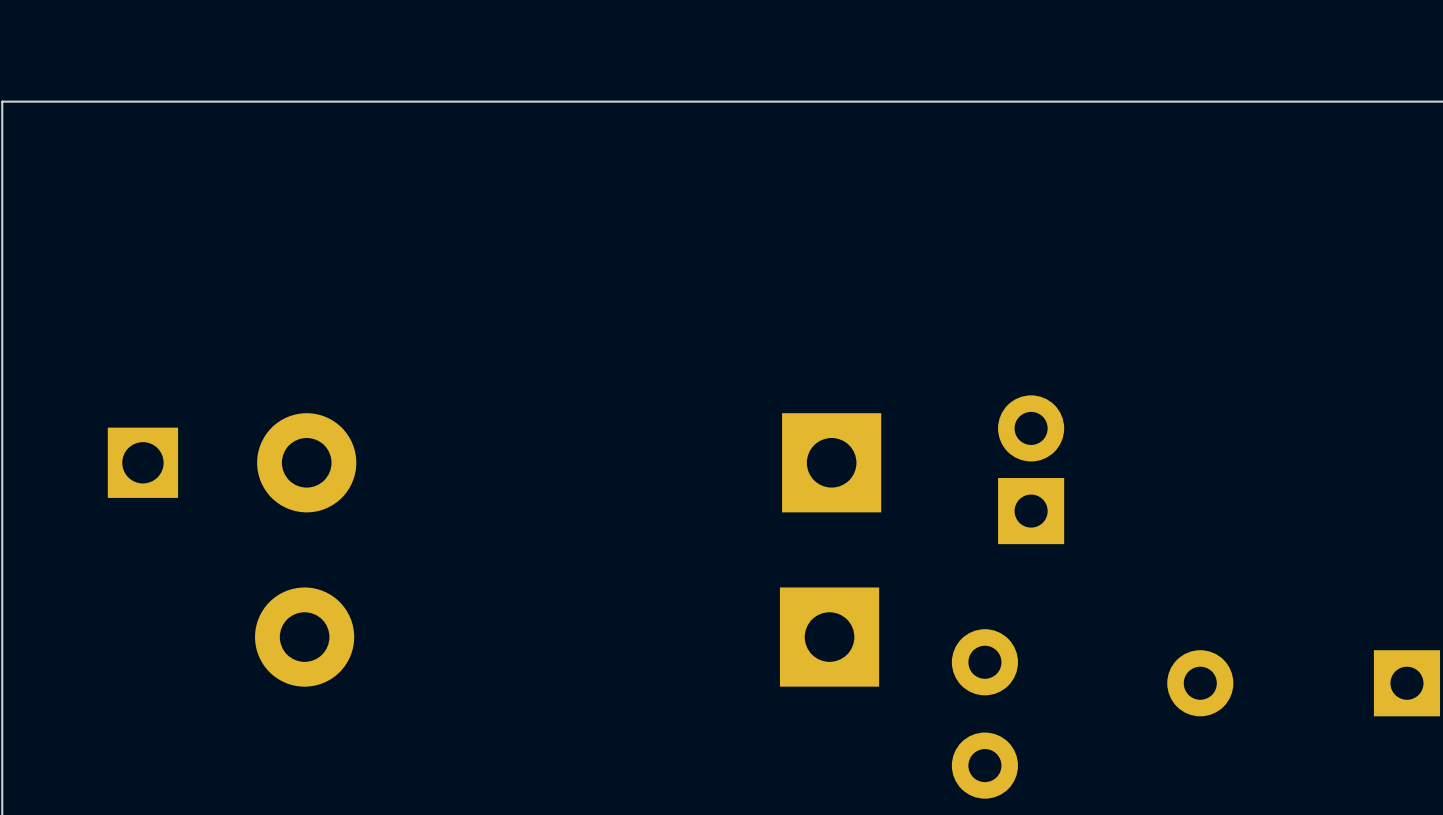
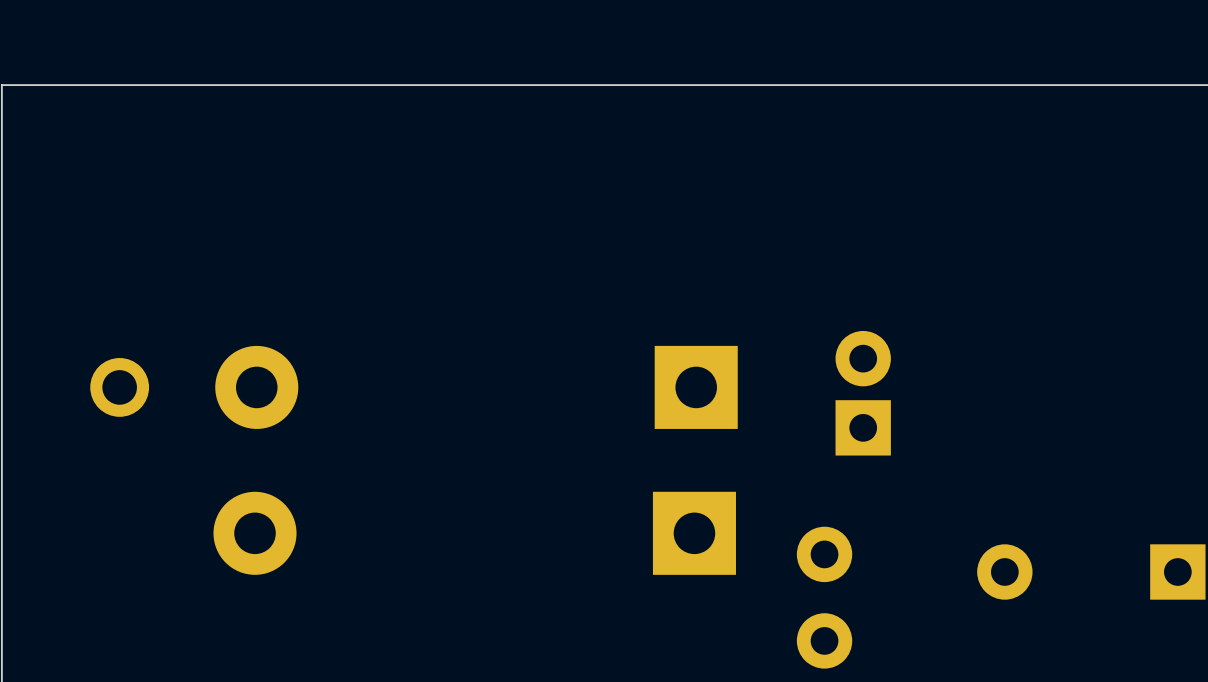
part footprint: [107, 427, 179, 498] -> [90, 358, 150, 417]

